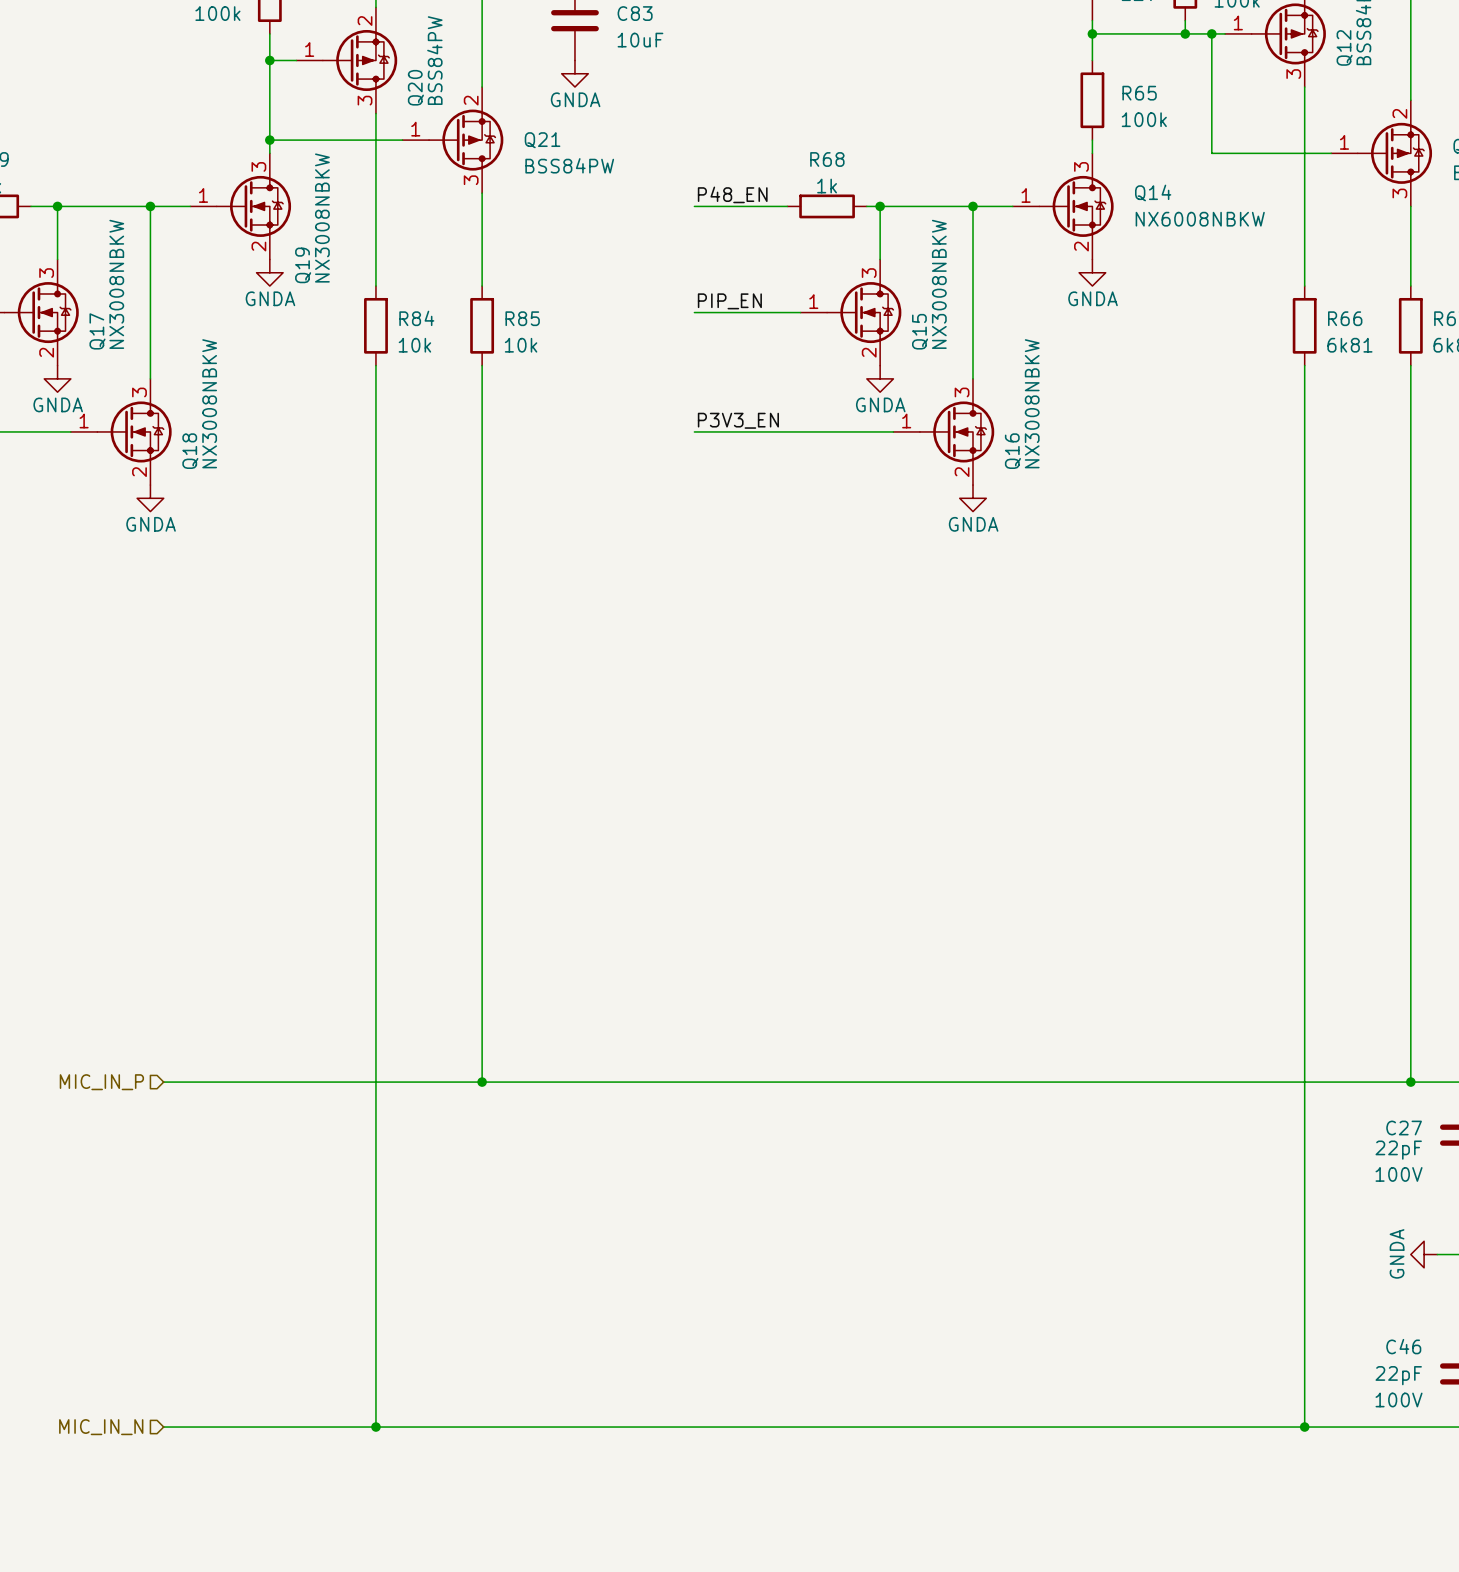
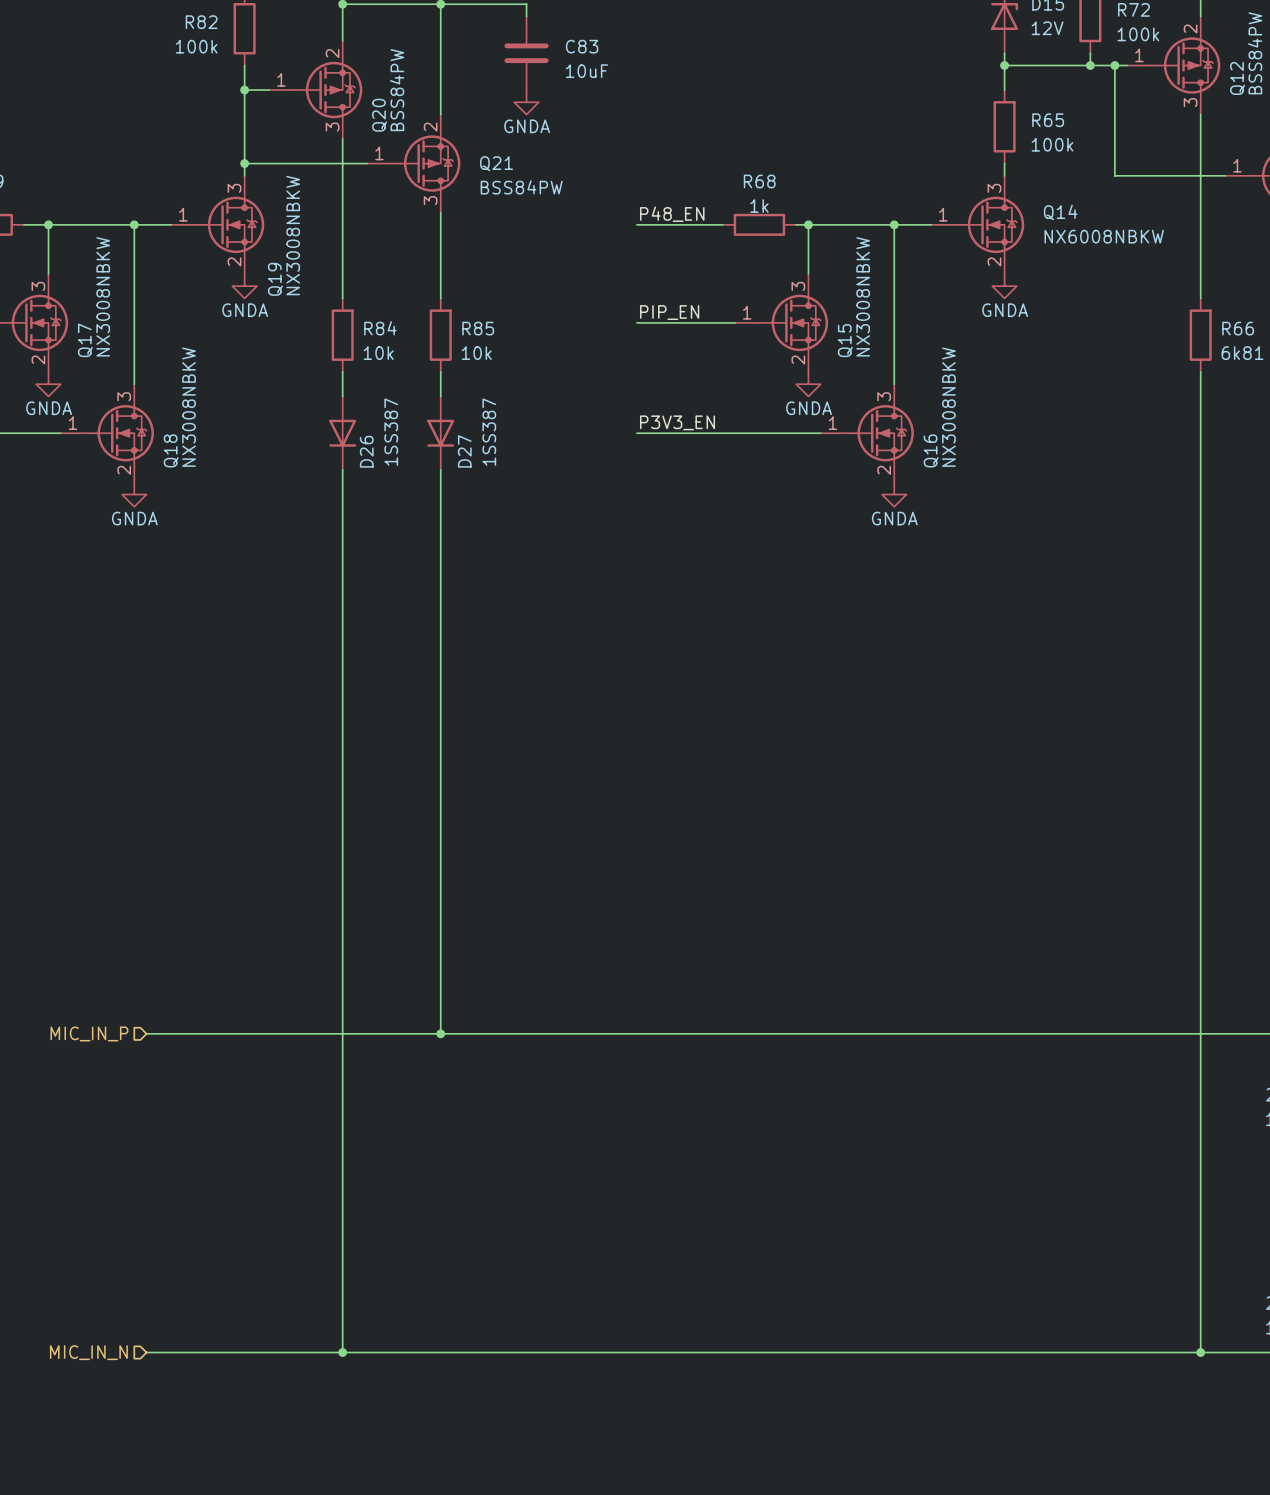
D26: none -> 1SS387 (342, 433)
D27: none -> 1SS387 (440, 433)

